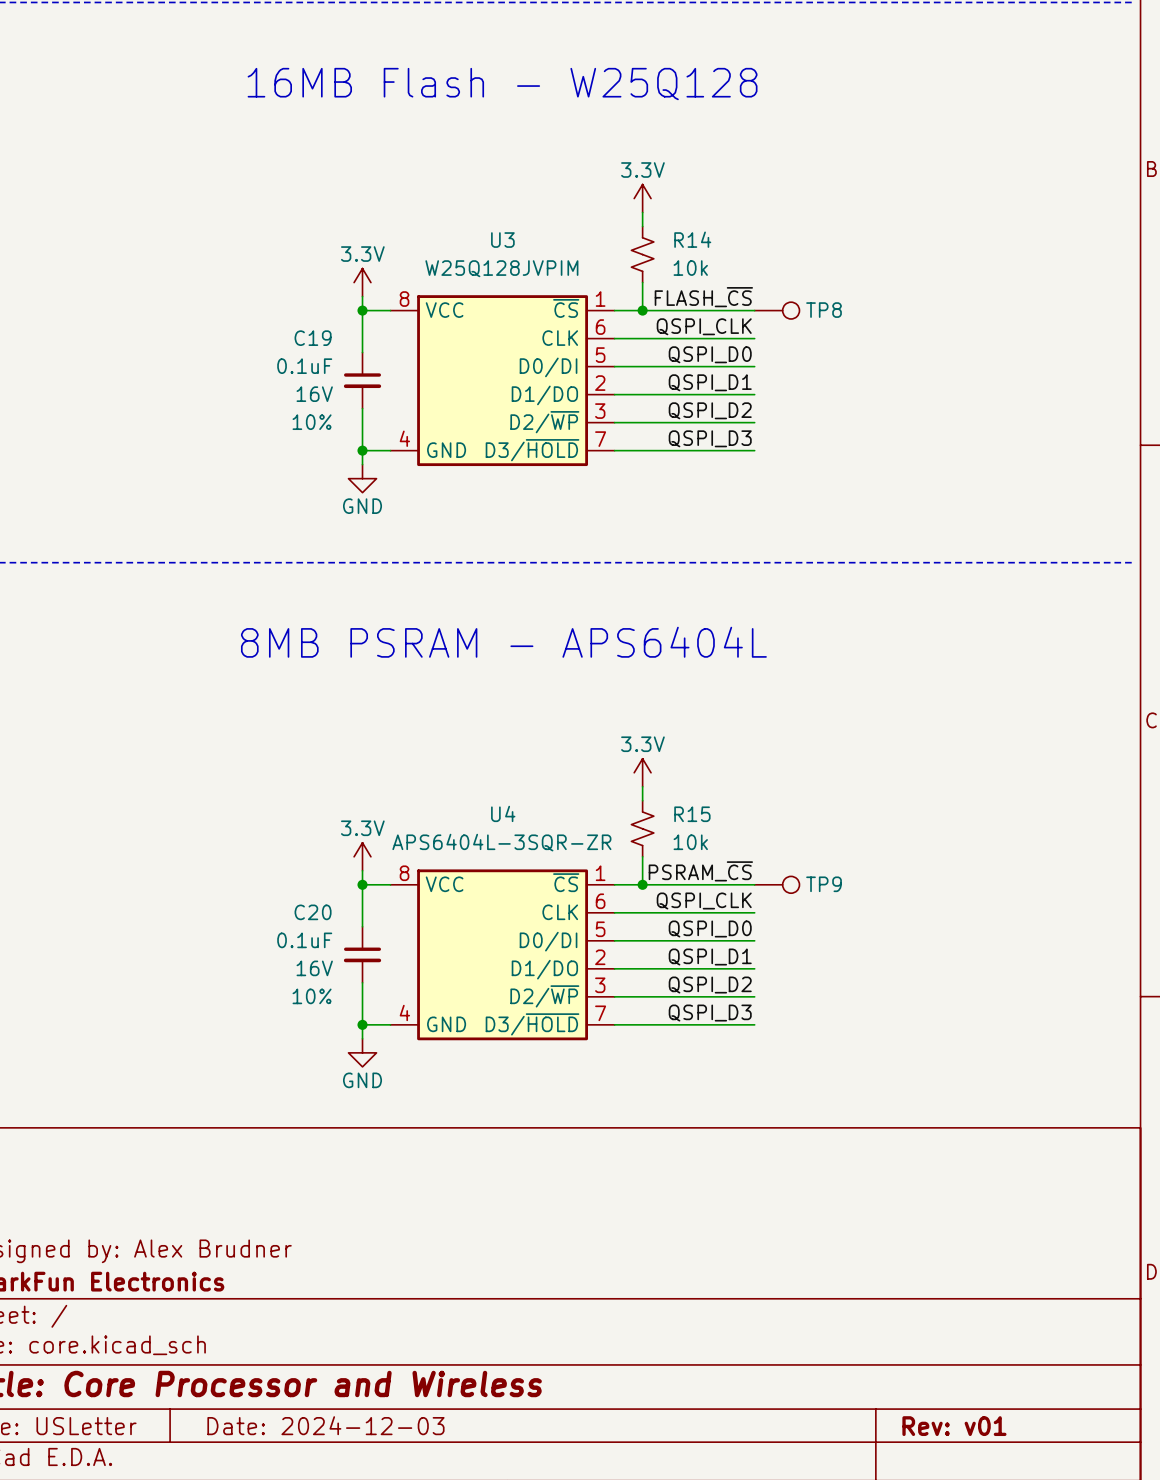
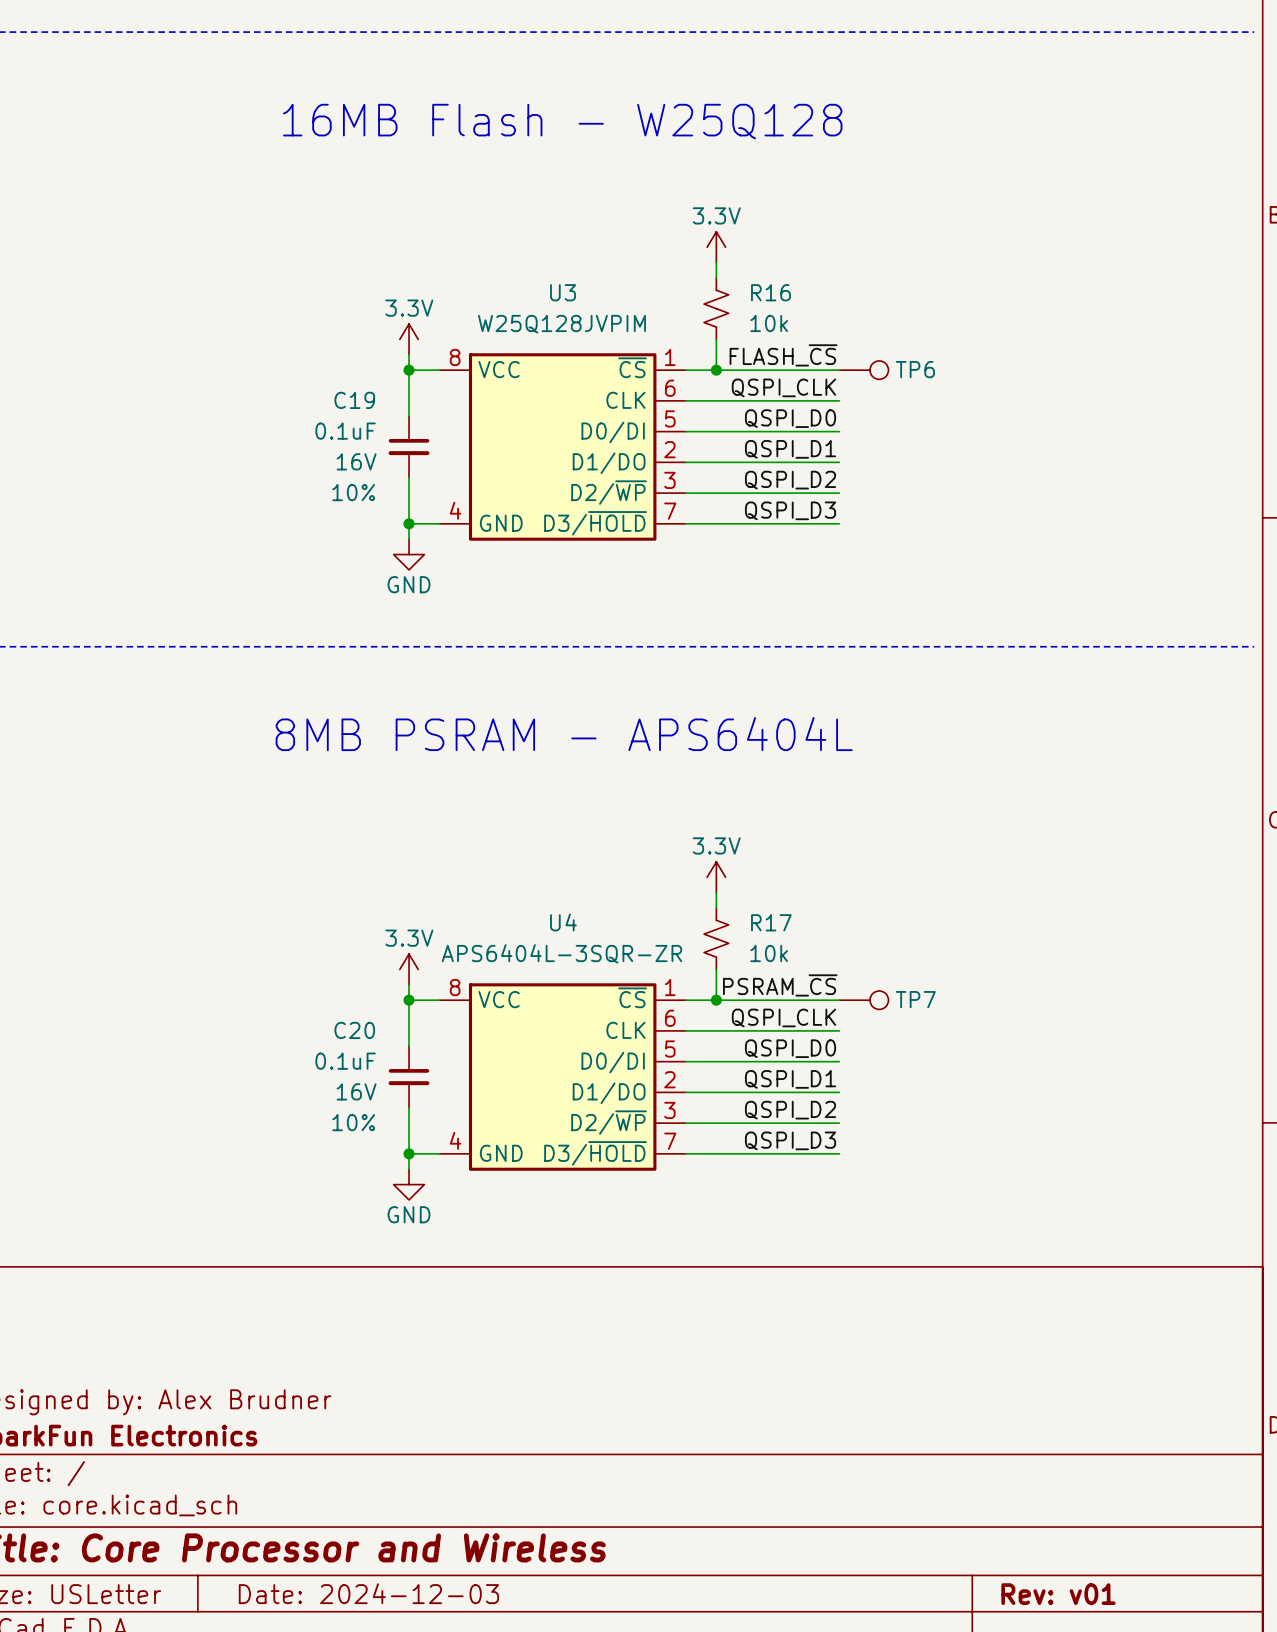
R14 name: R14 (692, 239) -> R16 (770, 292)
TP8 name: TP8 (824, 310) -> TP6 (915, 369)
R15 name: R15 (692, 814) -> R17 (771, 922)
TP9 name: TP9 (824, 884) -> TP7 (915, 999)

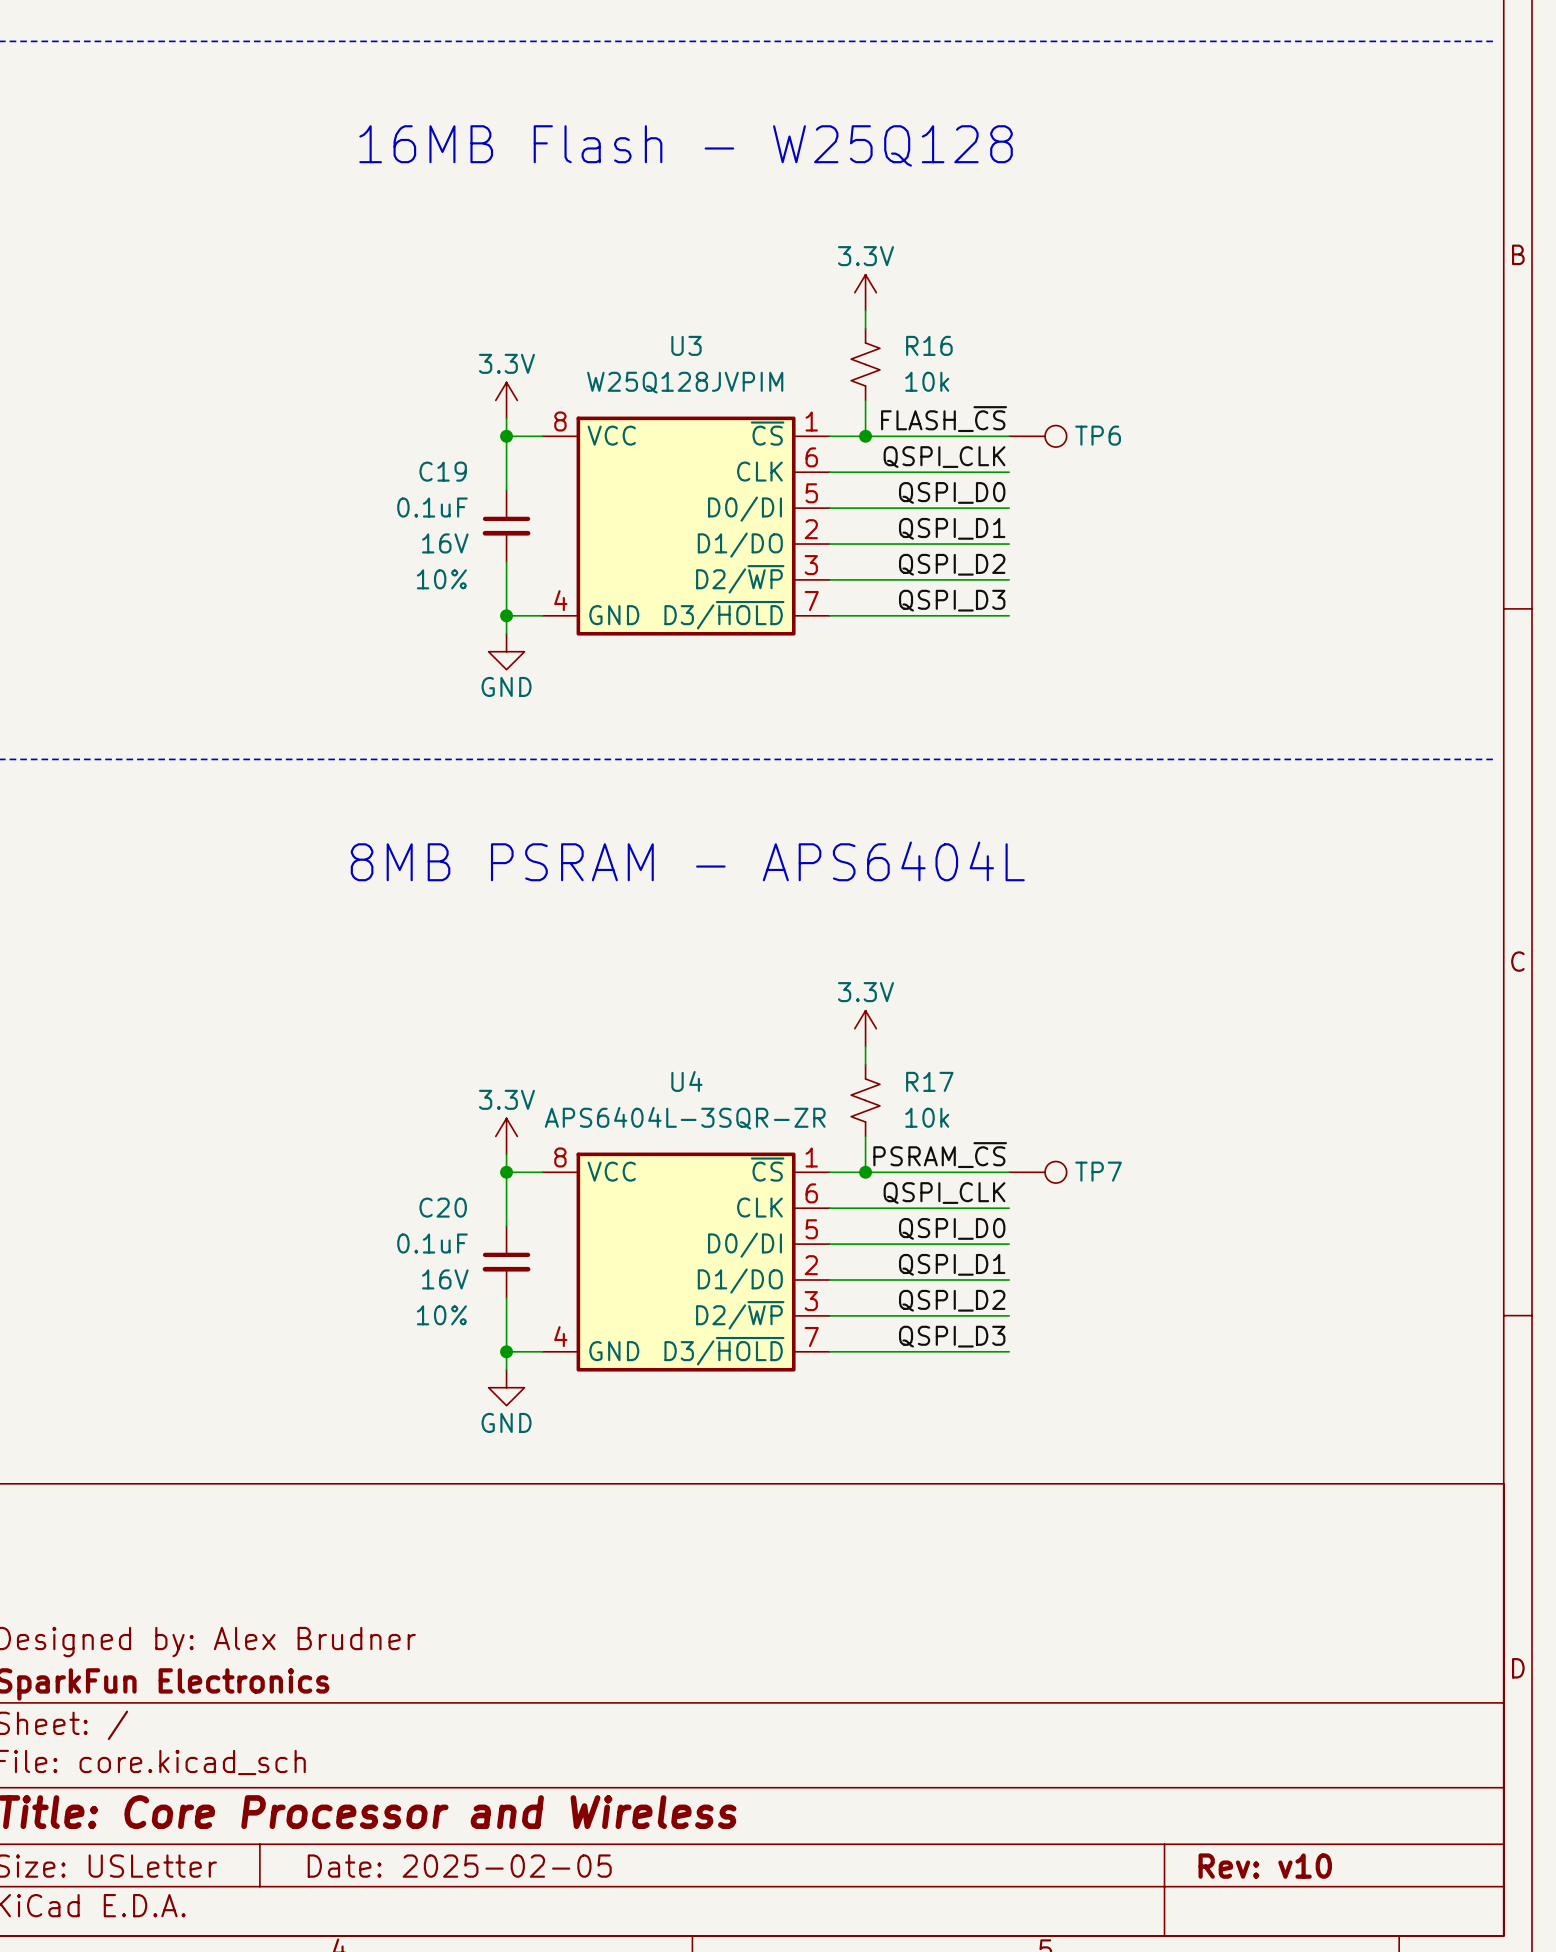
title block: Date: 2024-12-03 (368, 1593) -> Date: 2025-02-05 (459, 1866)
title block: Rev: v01 (1058, 1594) -> Rev: v10 (1265, 1866)

